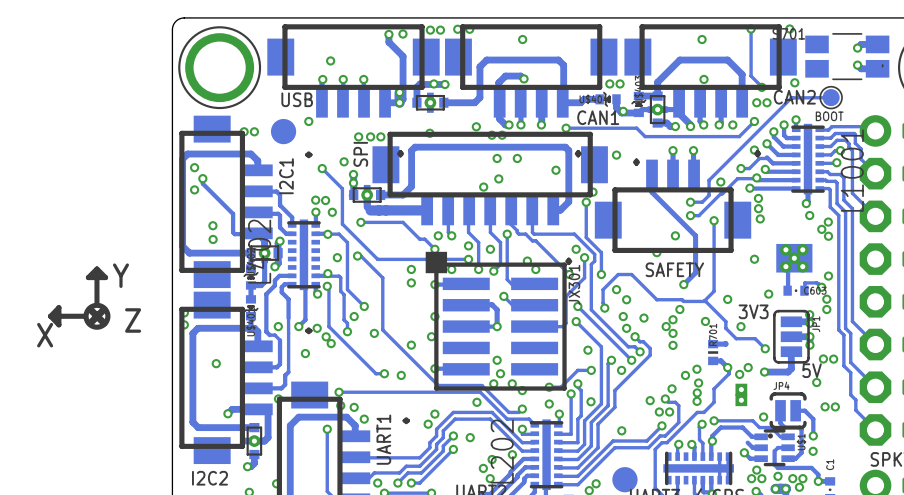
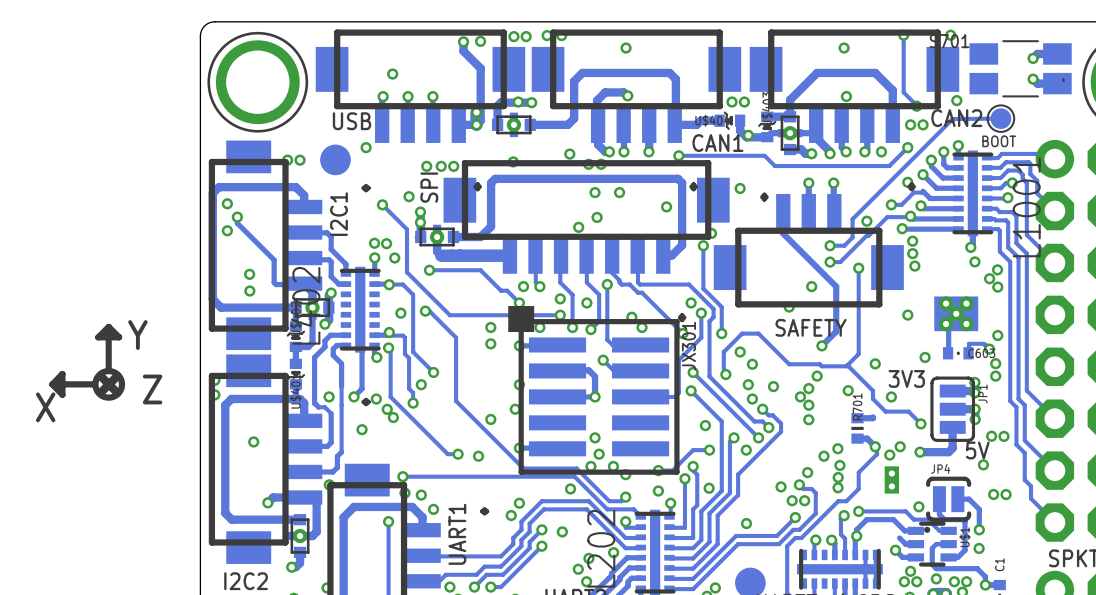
via: (374, 333) -> none

